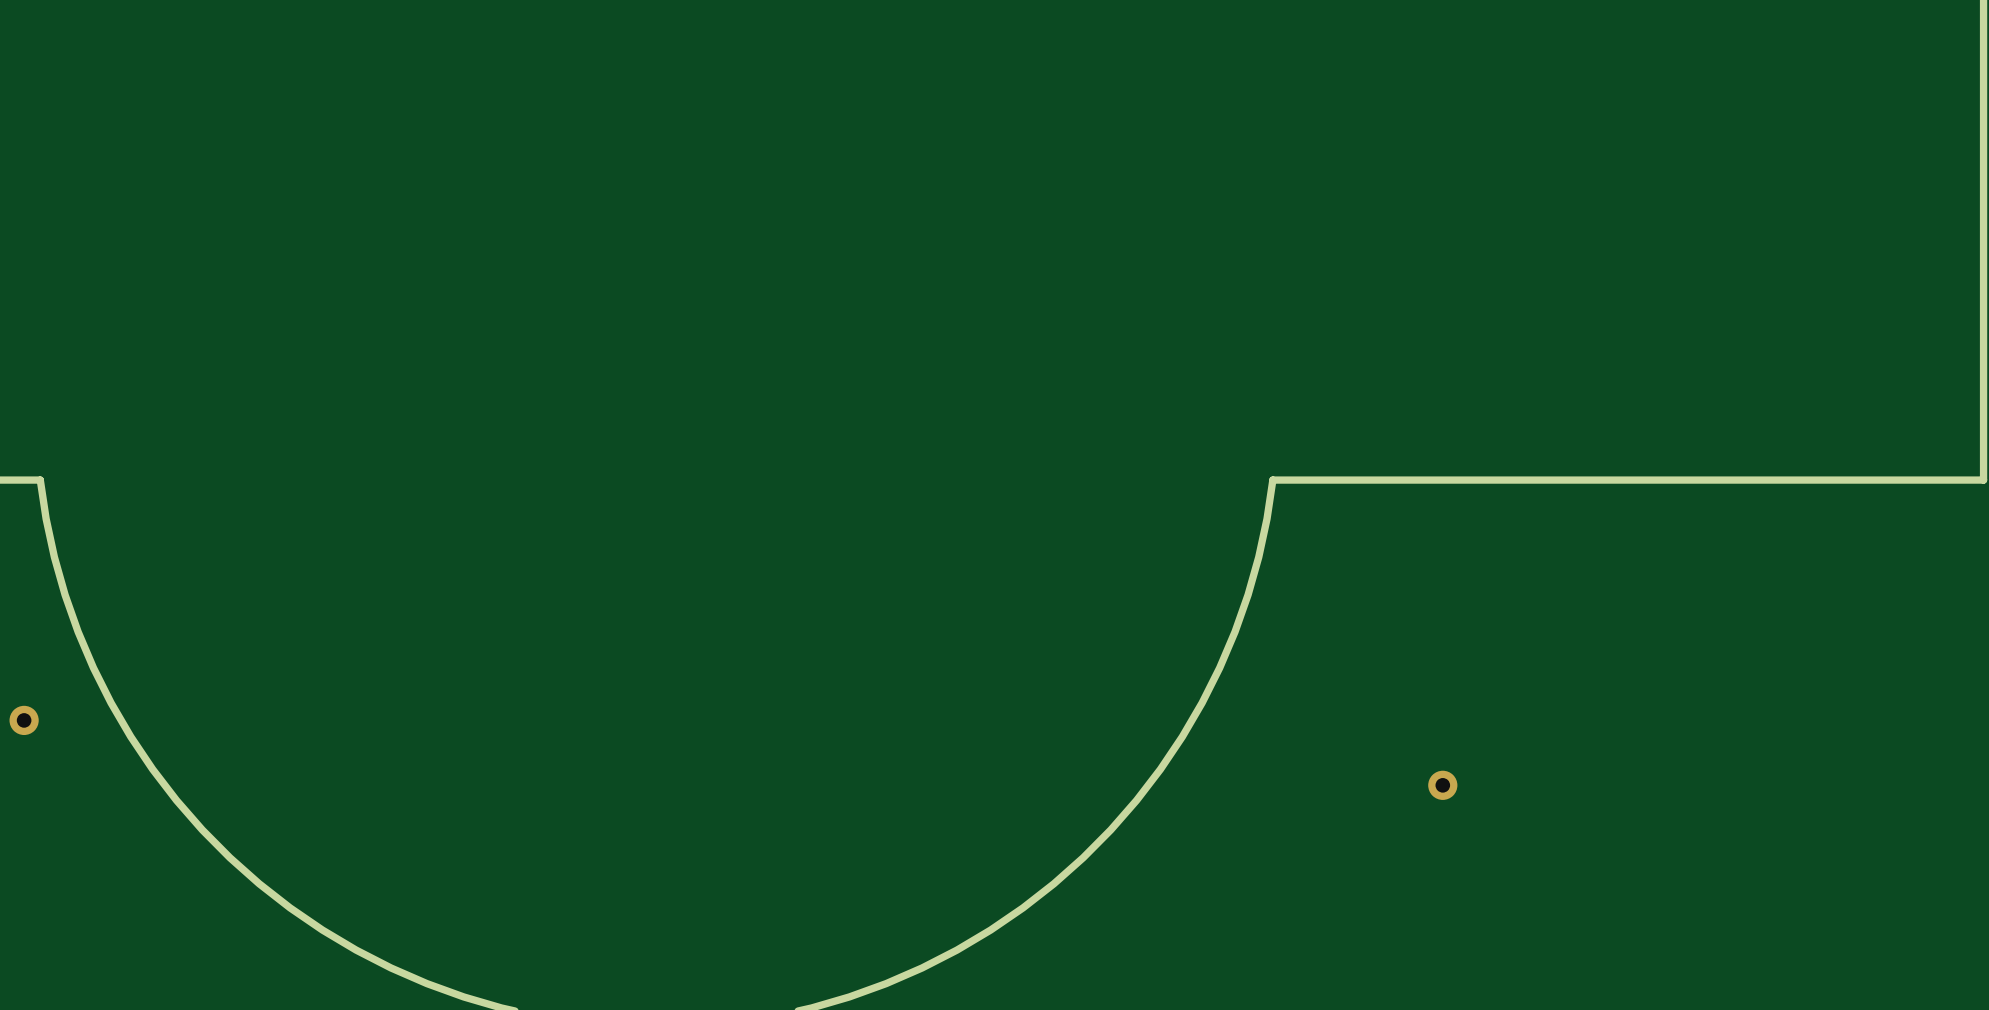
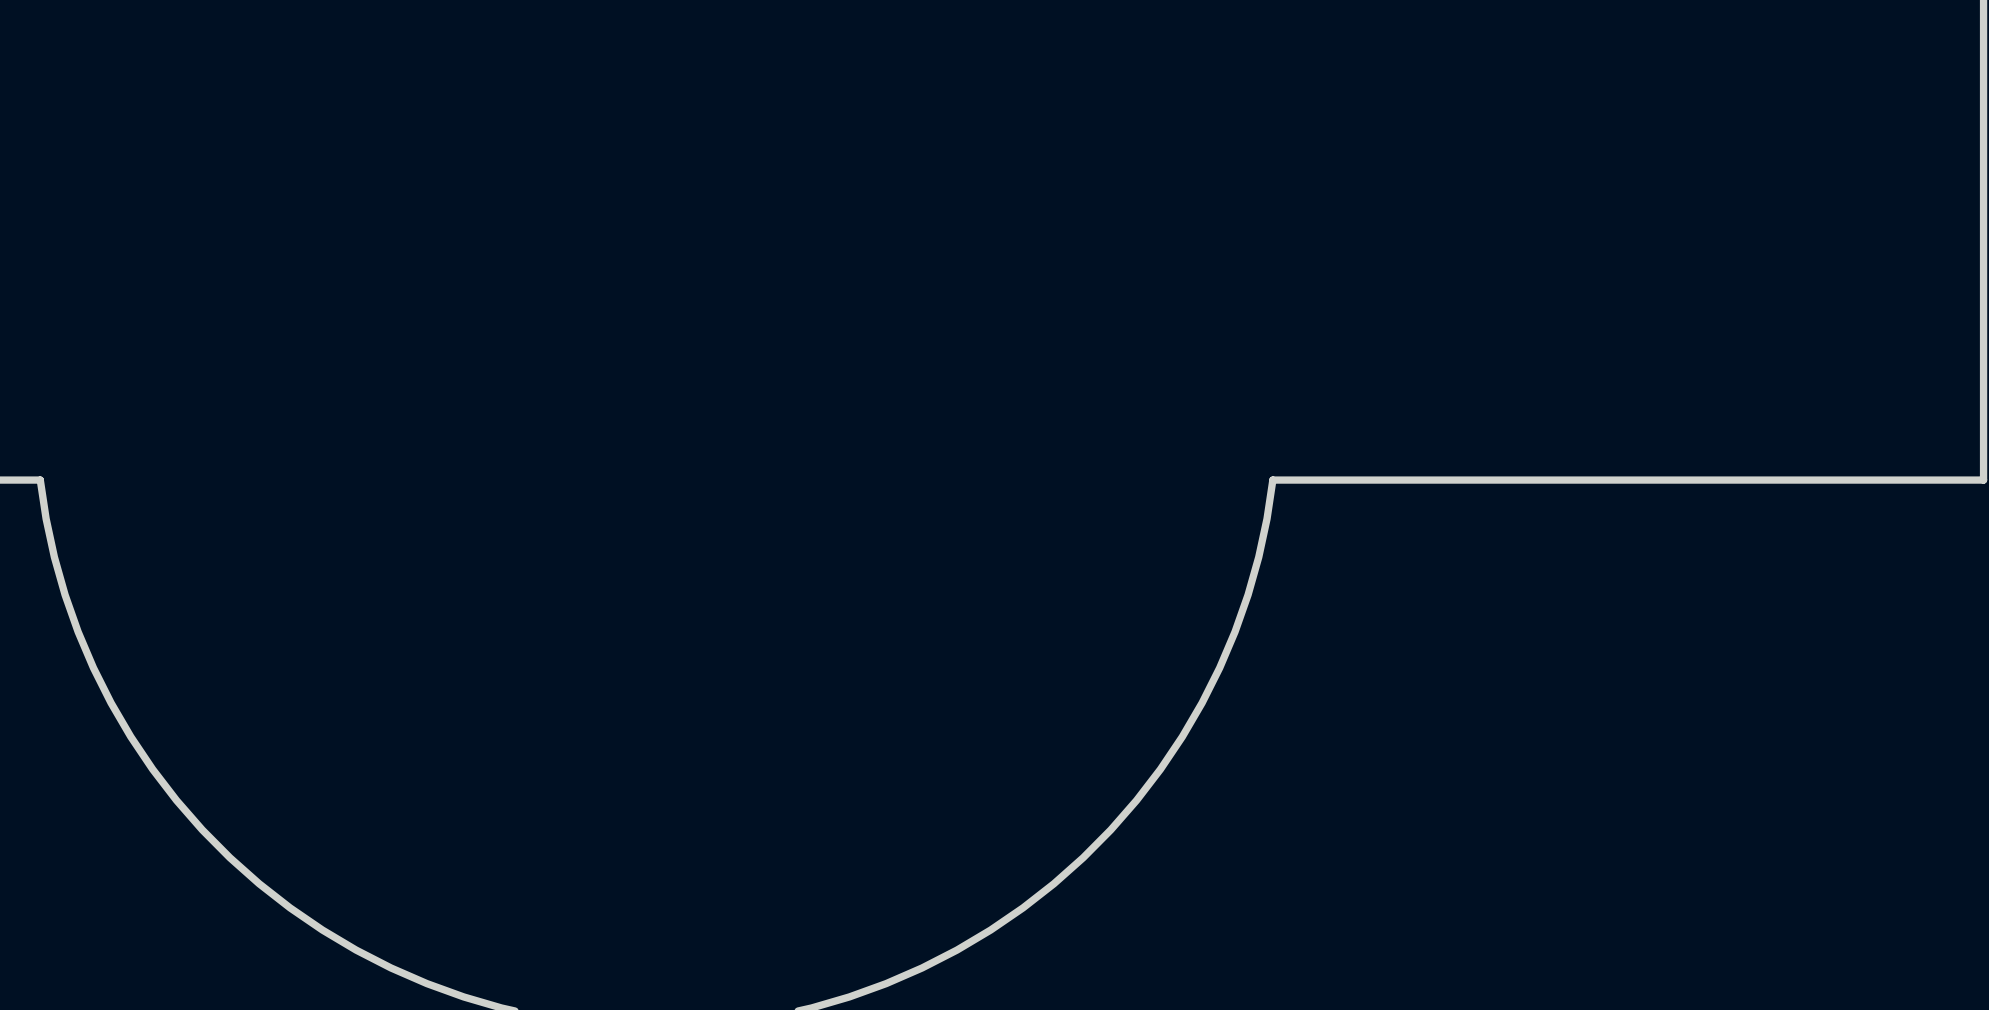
via: (24, 720) -> none
via: (1442, 785) -> none

